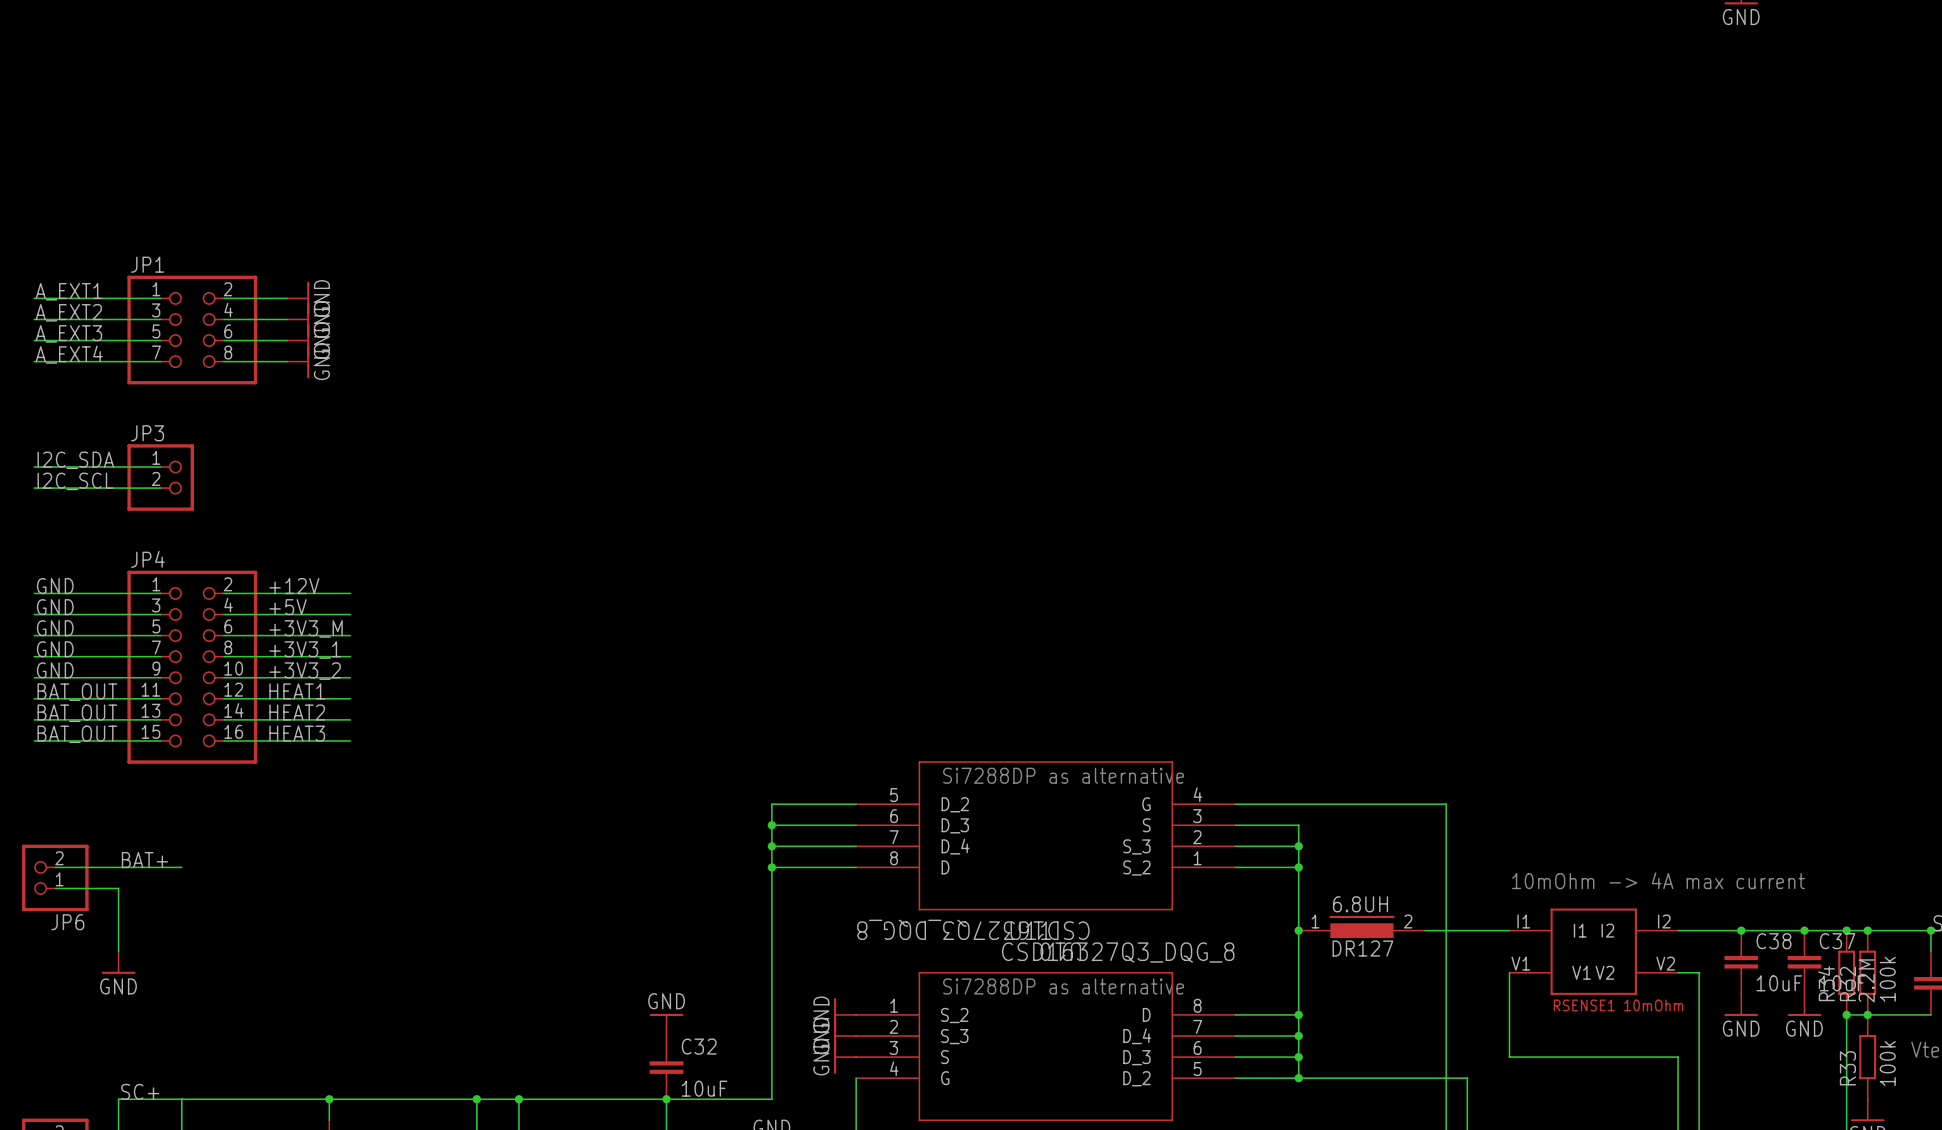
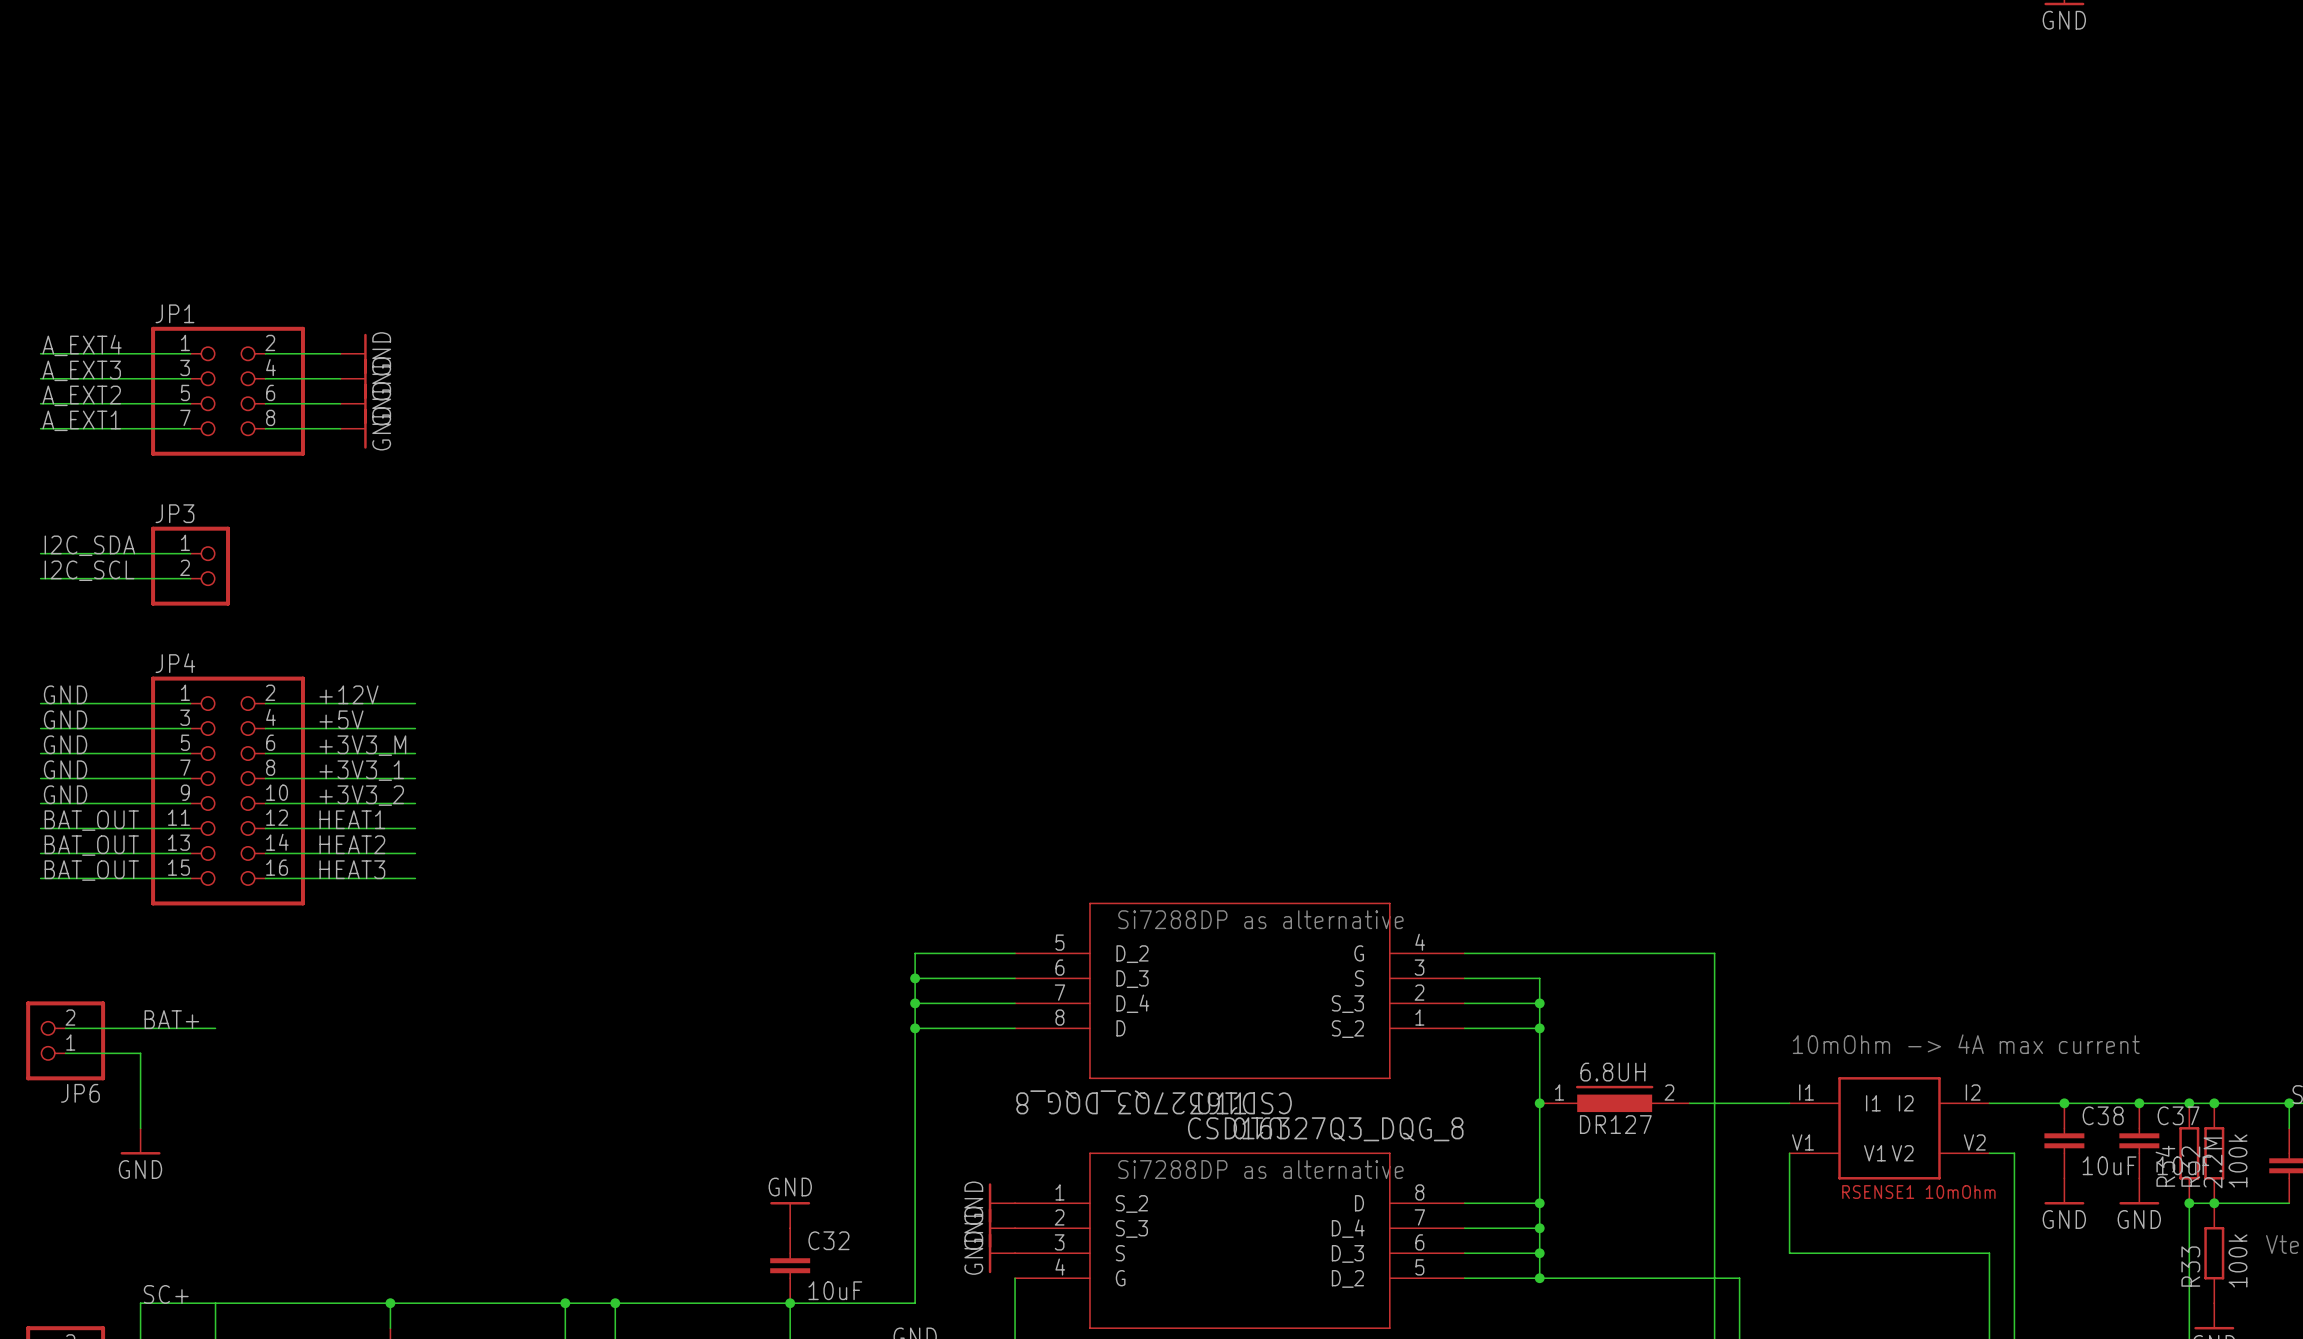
label: A_EXT1 (68, 291) -> A_EXT4 (82, 345)
label: A_EXT2 (68, 312) -> A_EXT3 (81, 370)
label: A_EXT3 (68, 333) -> A_EXT2 (81, 395)
label: A_EXT4 (69, 354) -> A_EXT1 (81, 420)

